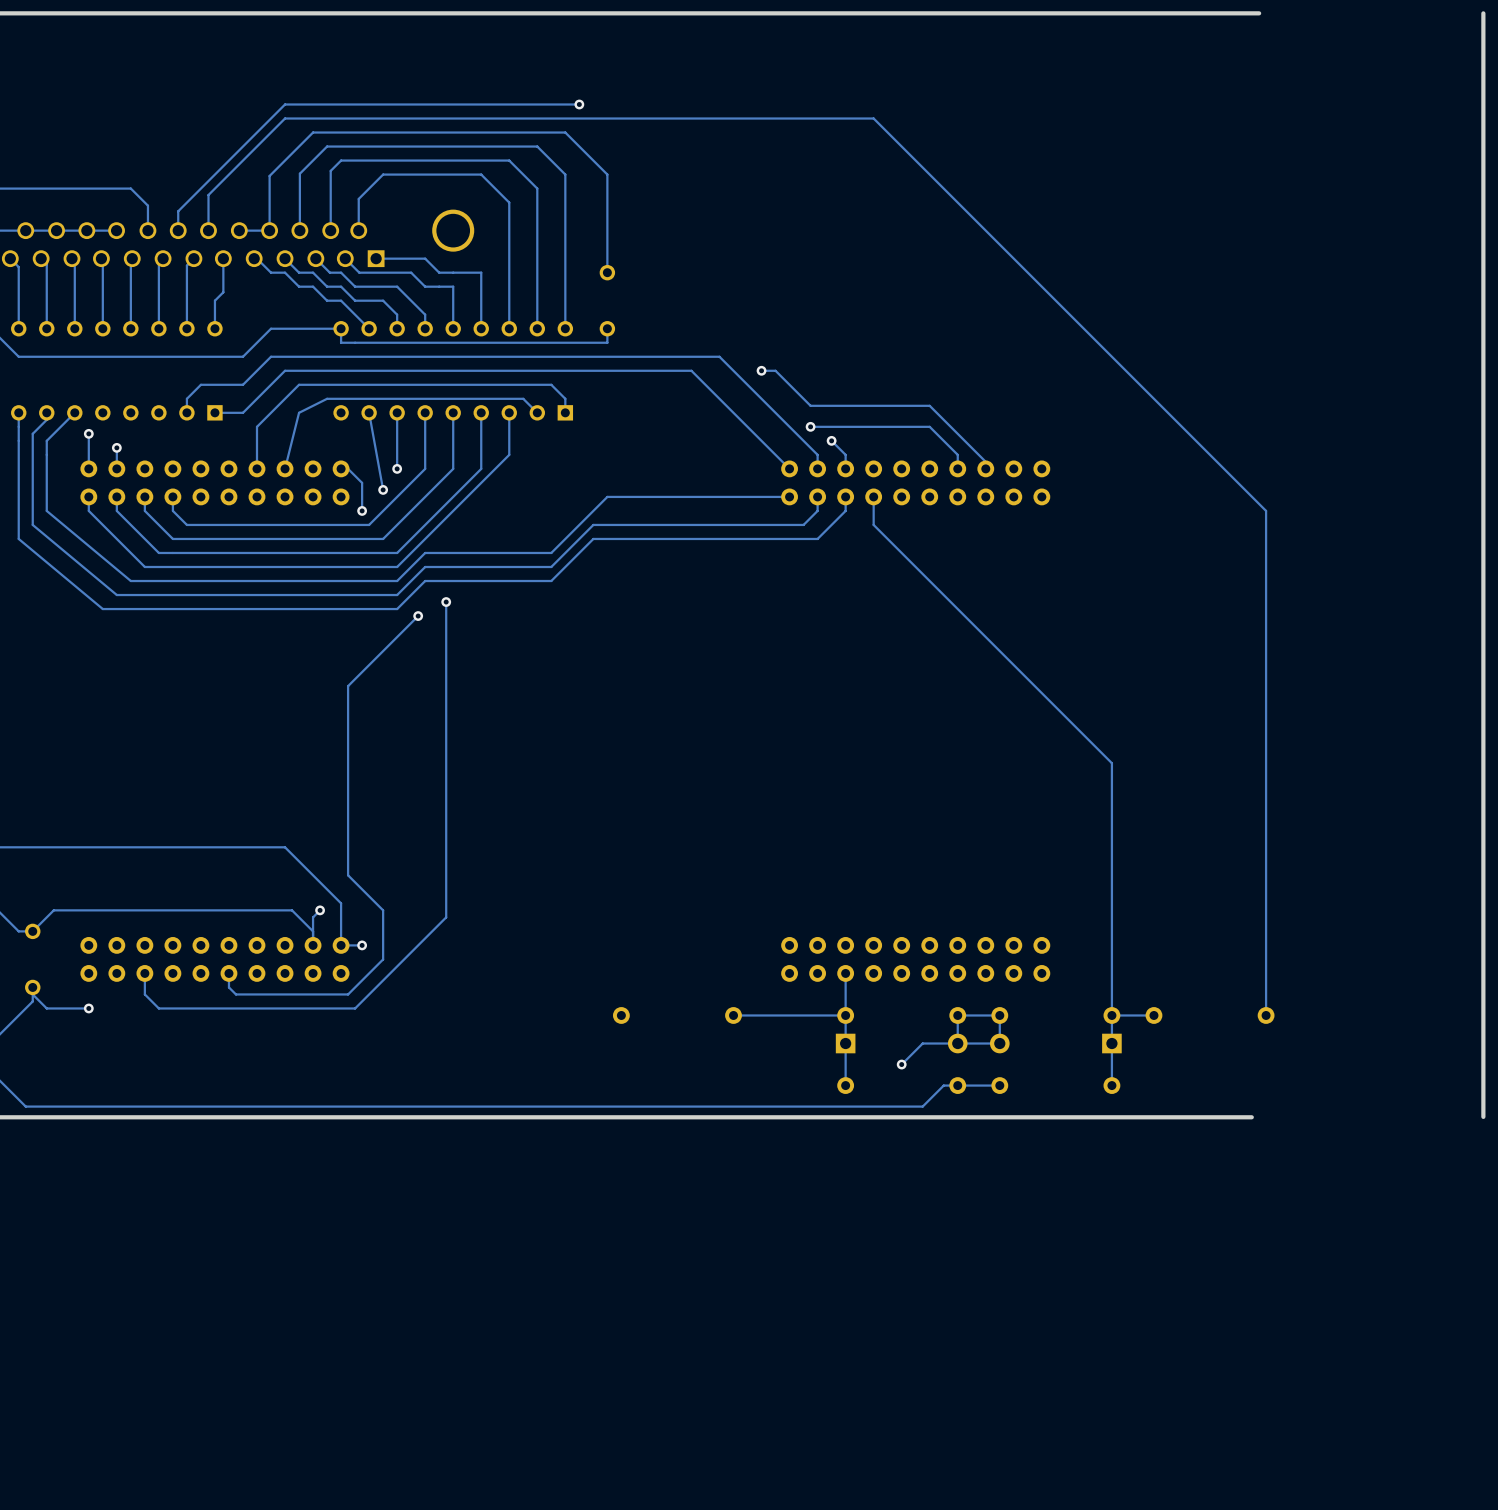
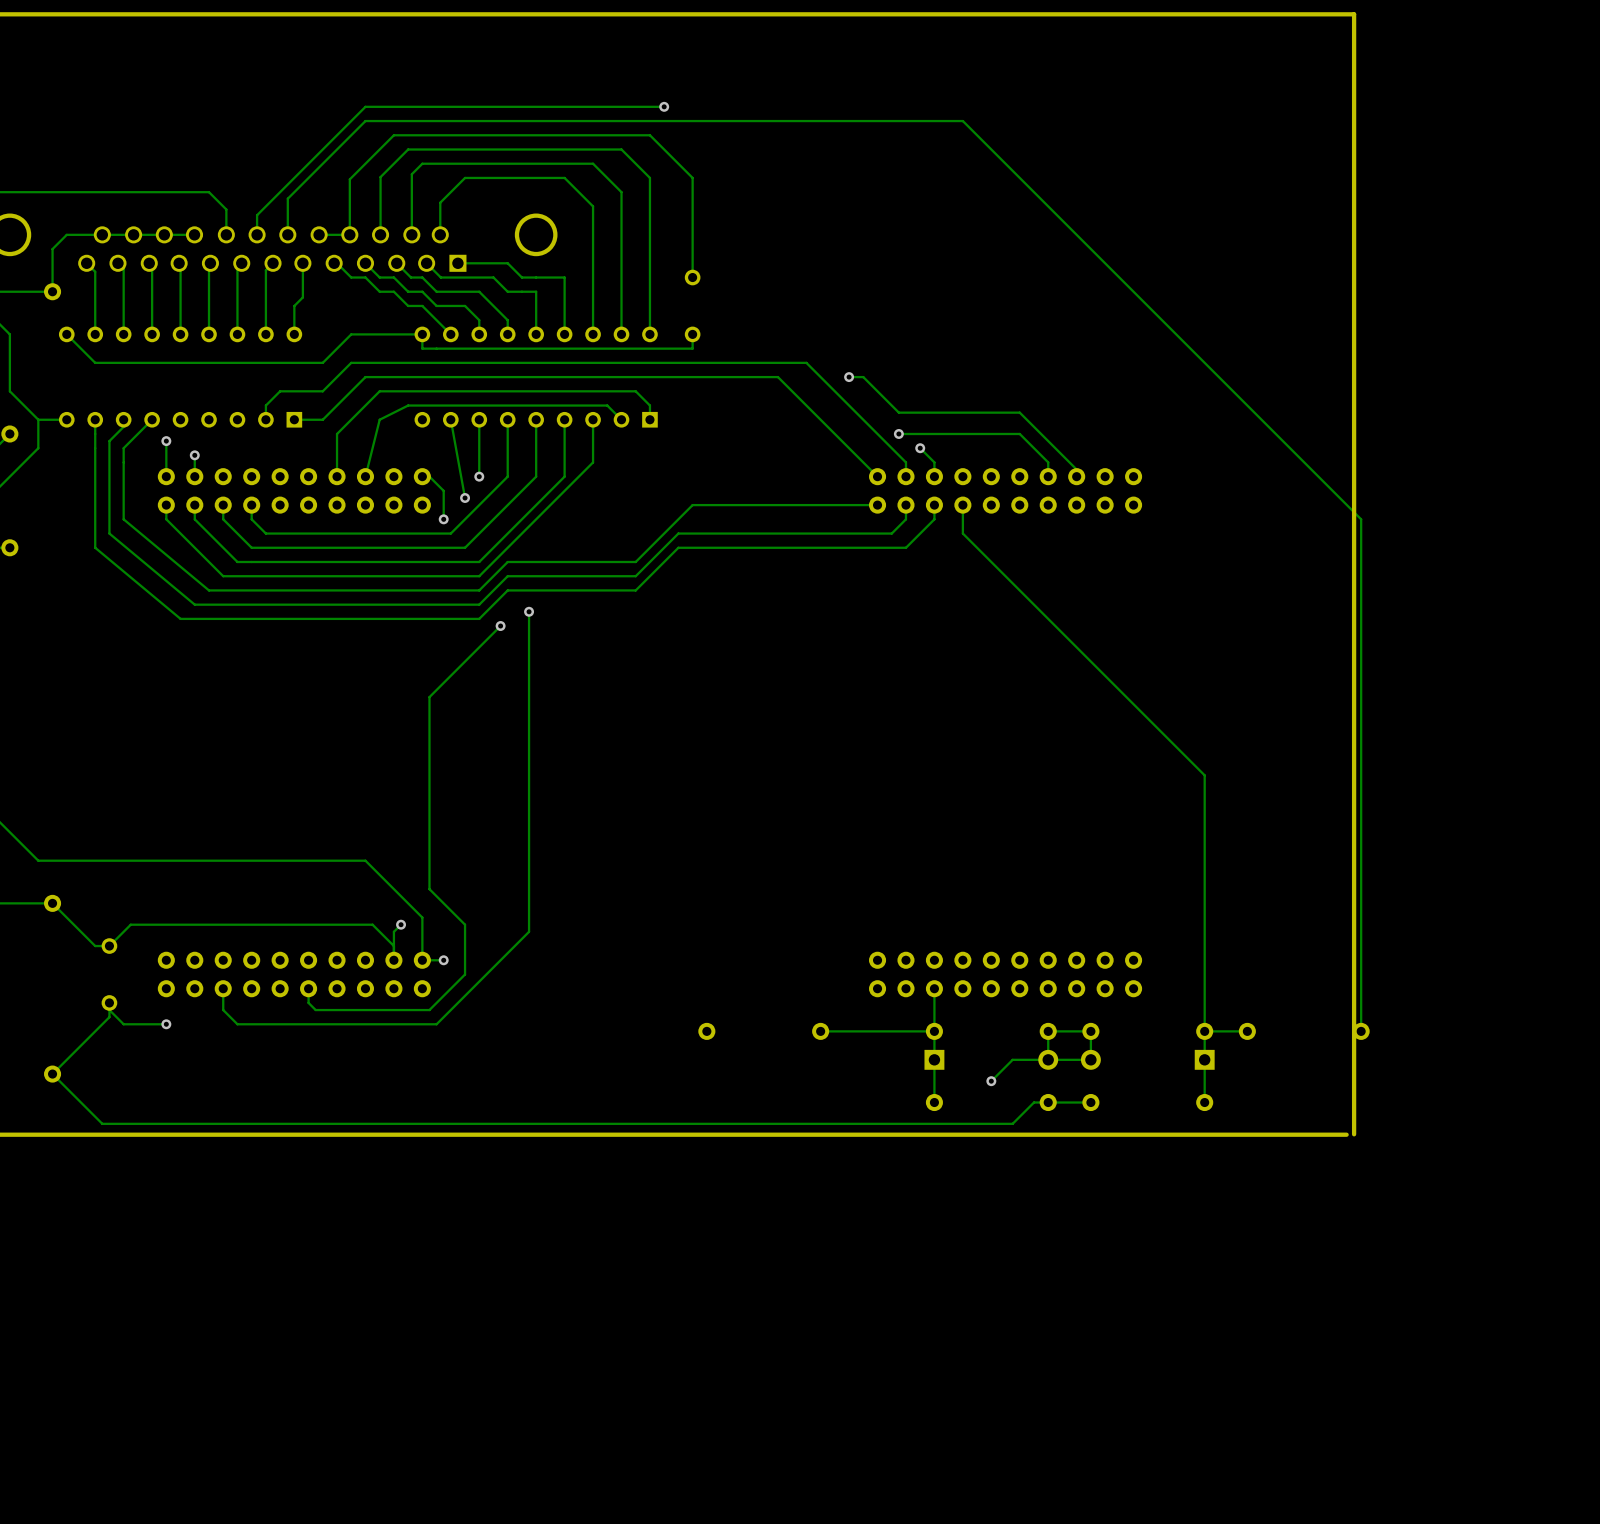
board edge: (1483, 13) (1483, 1116) -> (1354, 14) (1354, 1134)

